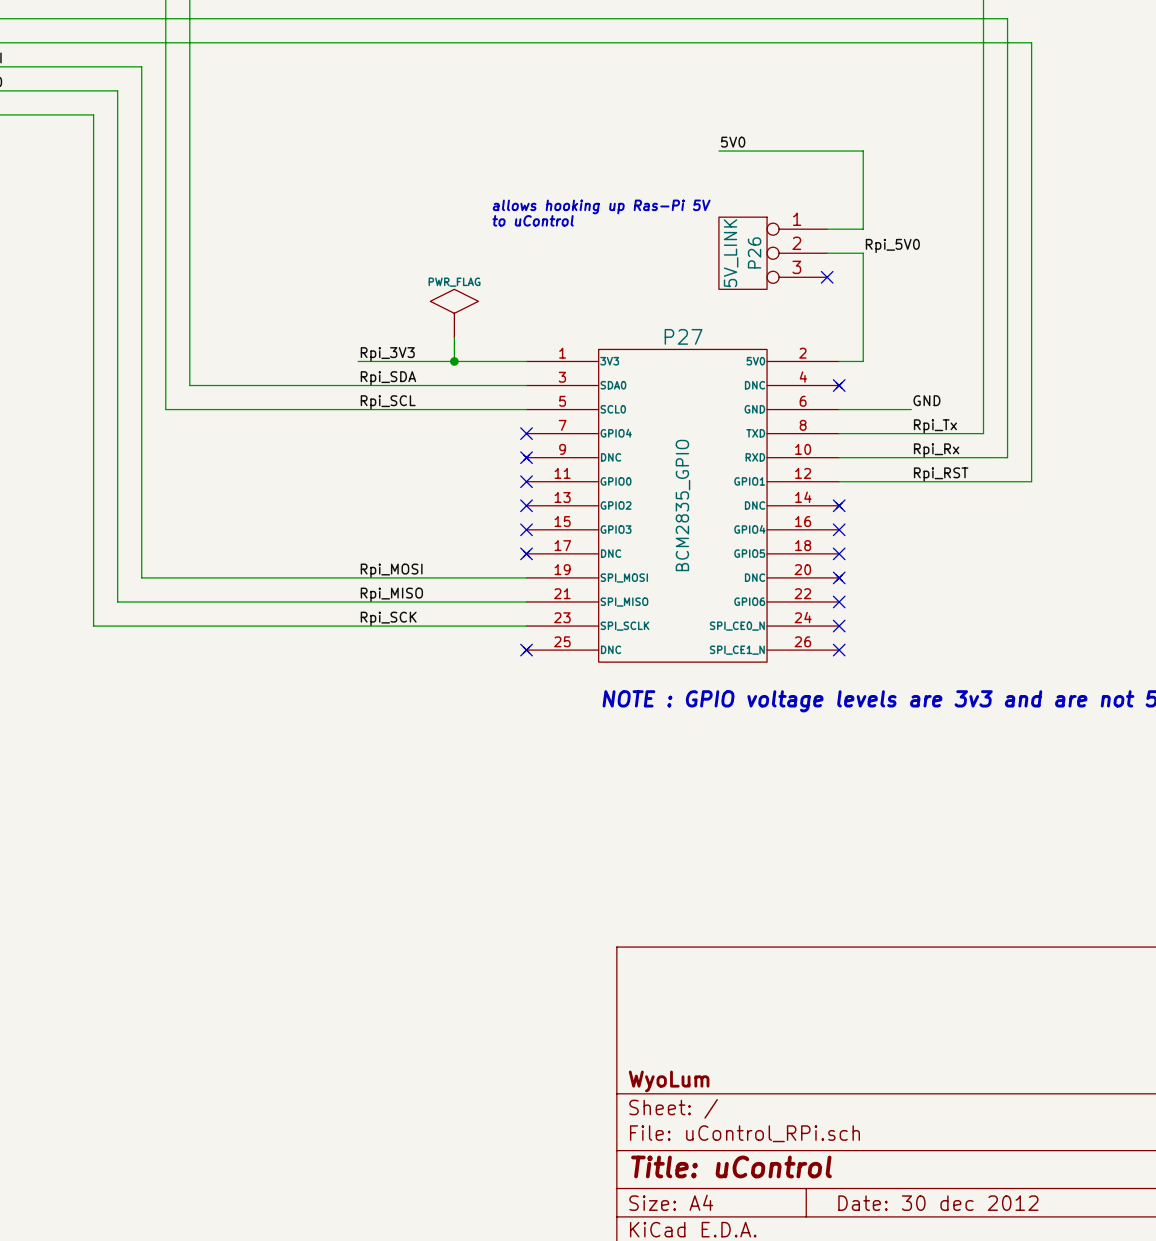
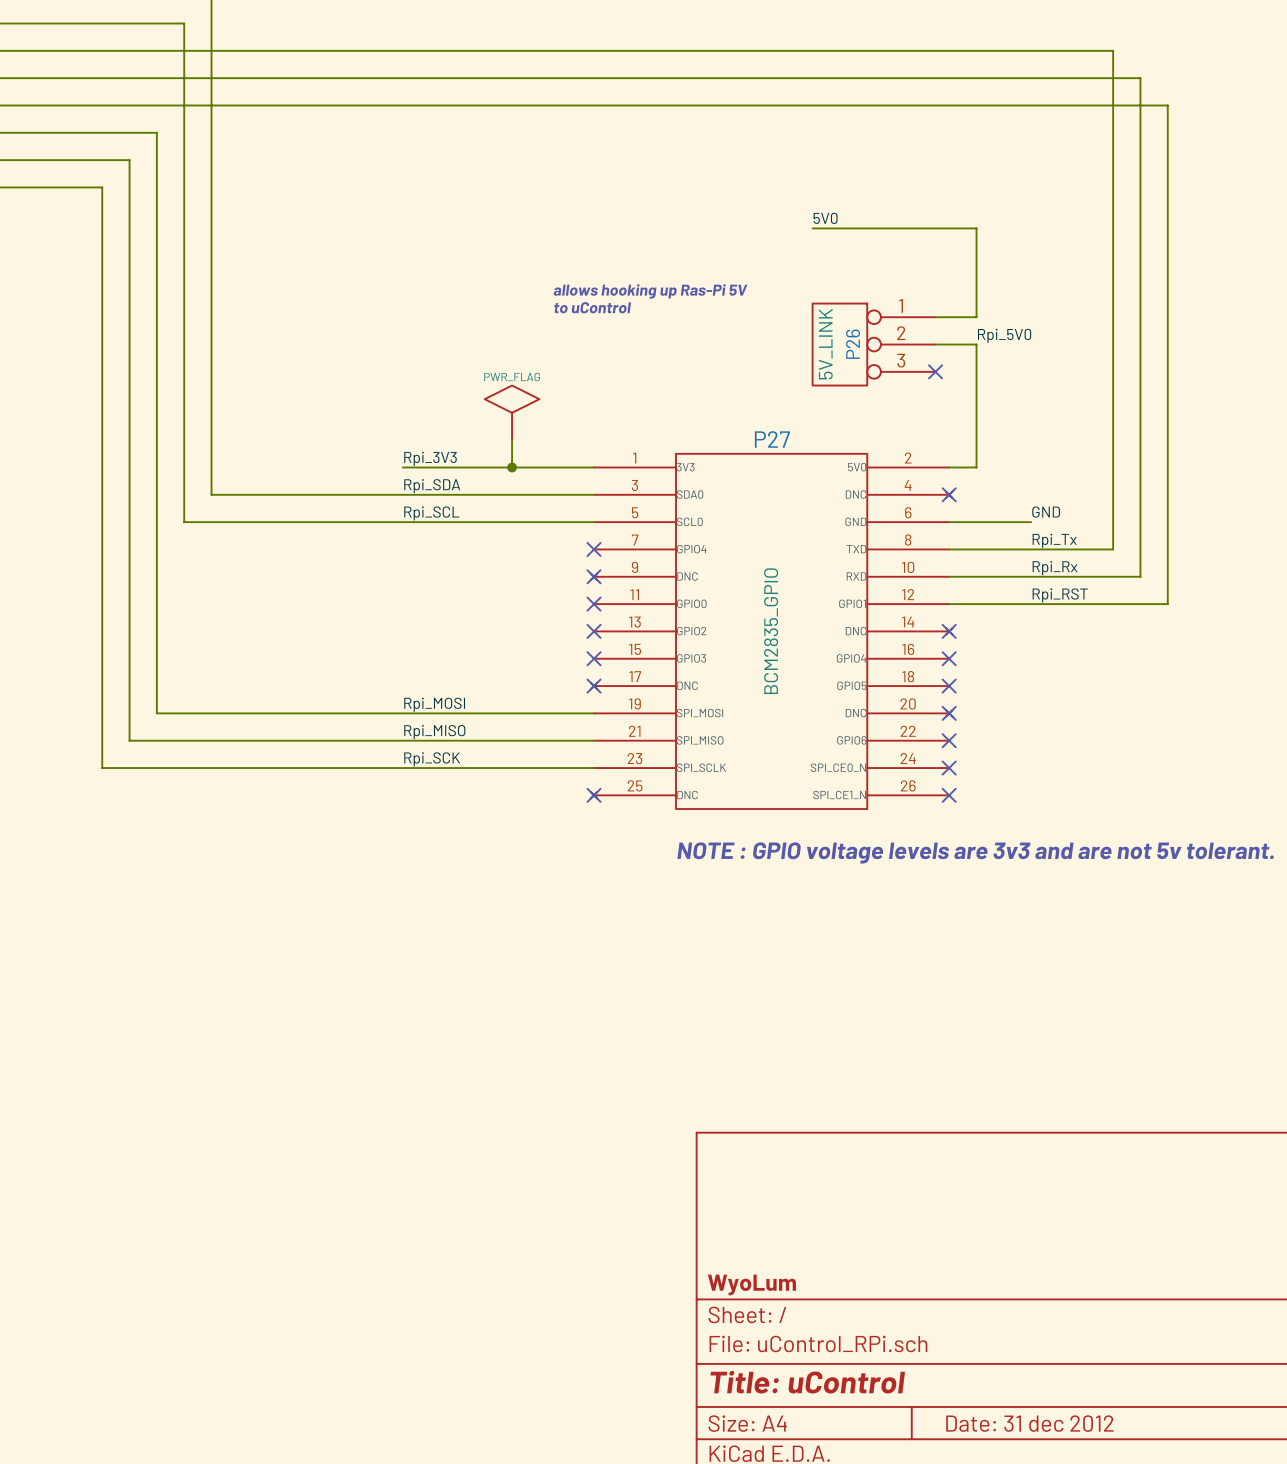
title block: Date: 30 dec 2012 (938, 1203) -> Date: 31 dec 2012 (1029, 1423)

